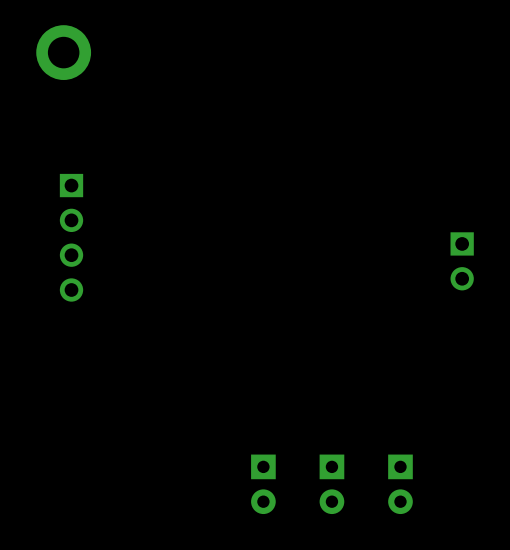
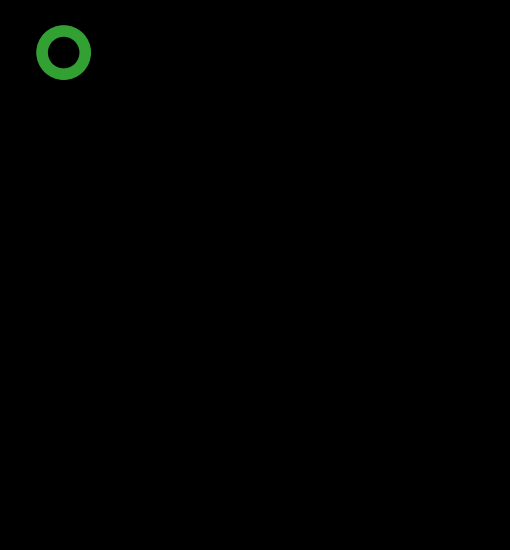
part: (71, 237) -> none
part: (462, 261) -> none
part: (263, 484) -> none
part: (331, 484) -> none
part: (400, 484) -> none

